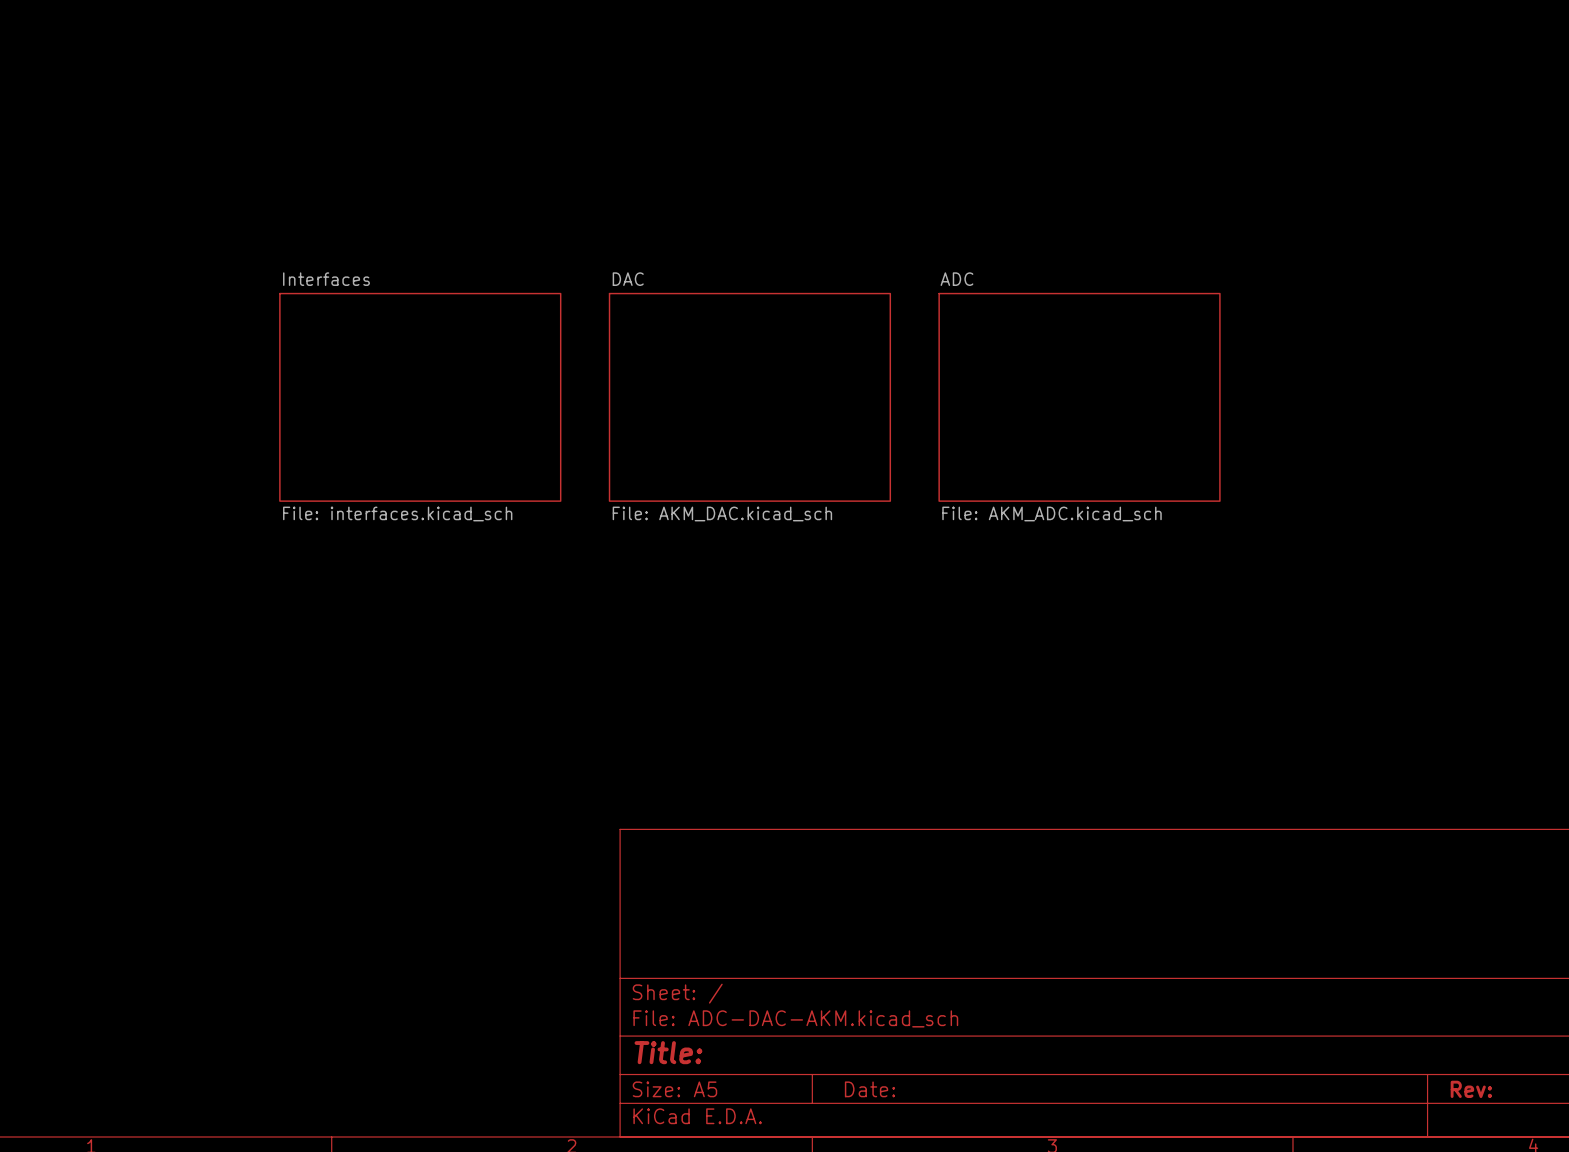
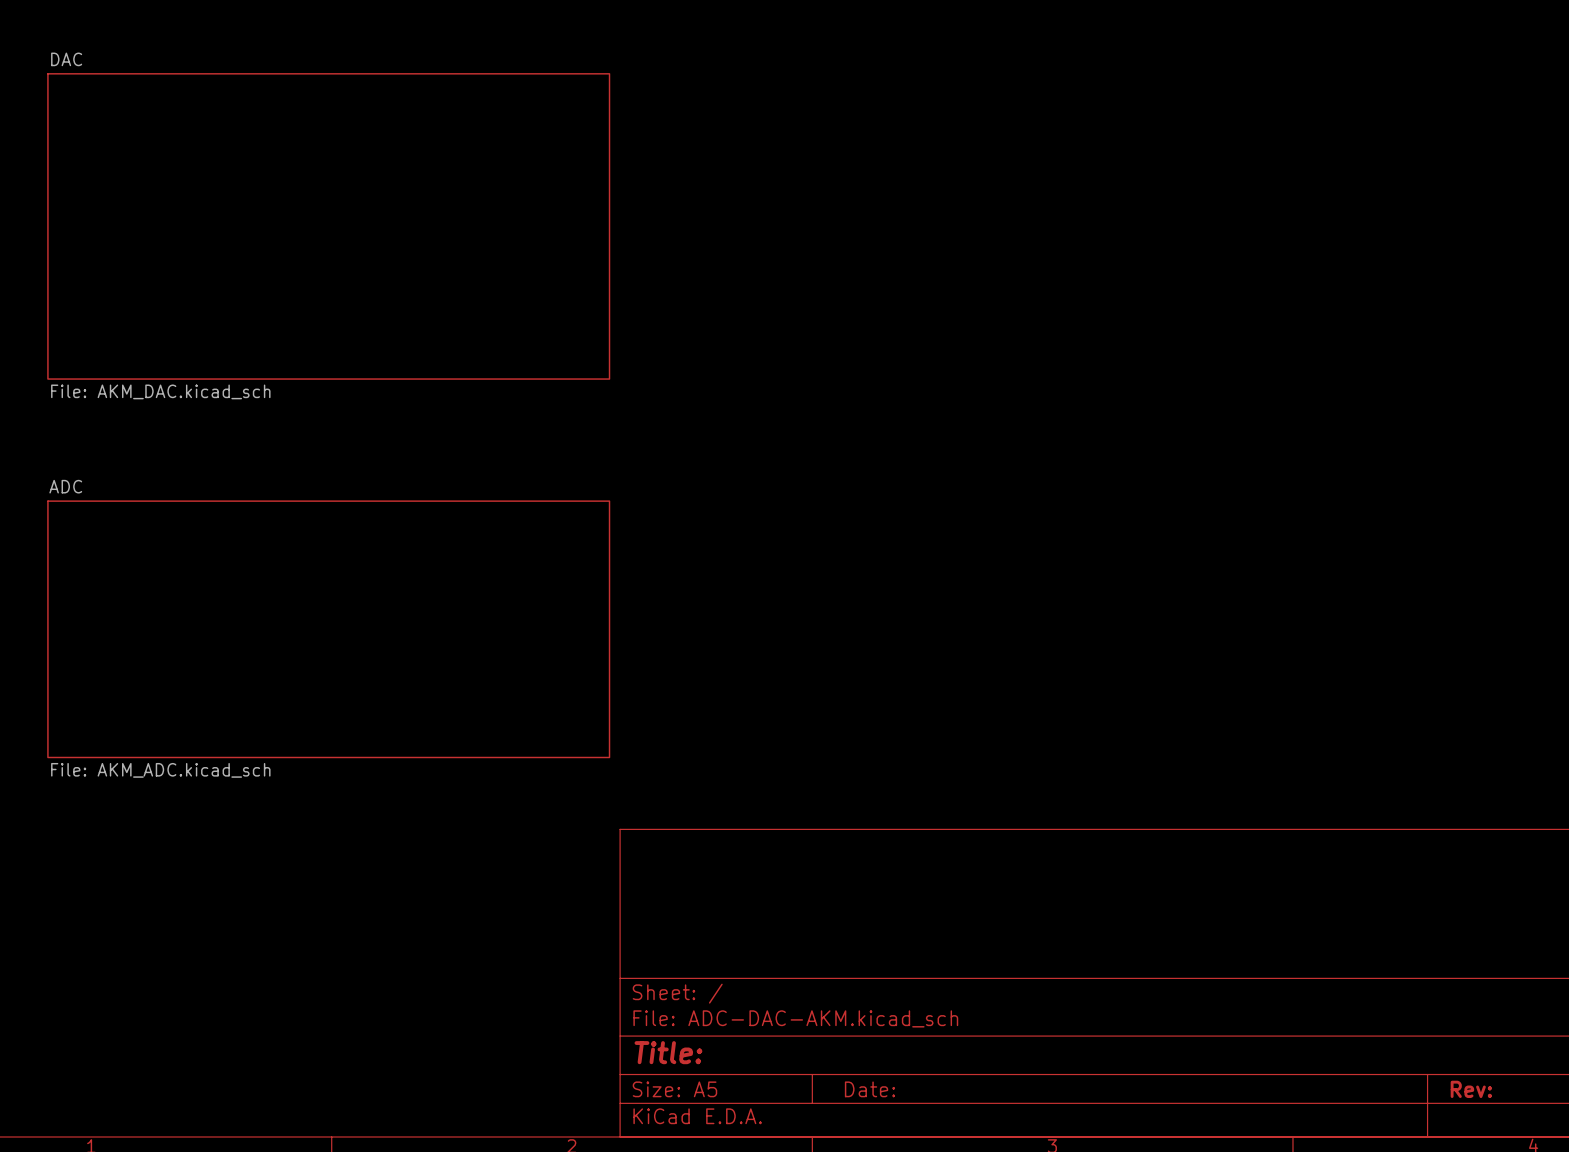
sheet DAC: none -> File: AKM_DAC.kicad_sch (328, 226)
sheet Interfaces: File: interfaces.kicad_sch (420, 397) -> none
sheet DAC: File: AKM_DAC.kicad_sch (749, 397) -> none
sheet ADC: File: AKM_ADC.kicad_sch (1079, 397) -> none
sheet ADC: none -> File: AKM_ADC.kicad_sch (328, 629)

